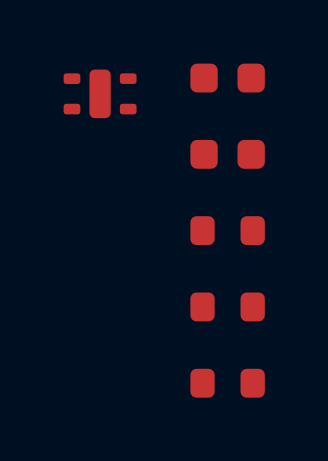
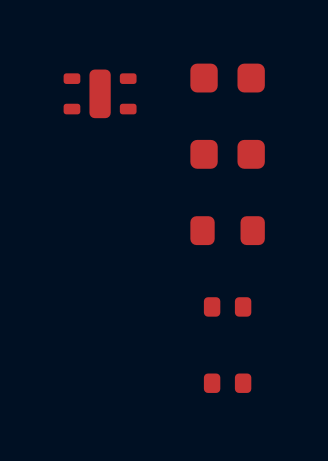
part footprint: [190, 292, 265, 322] -> [203, 297, 252, 317]
part footprint: [190, 368, 265, 398] -> [203, 373, 252, 393]

